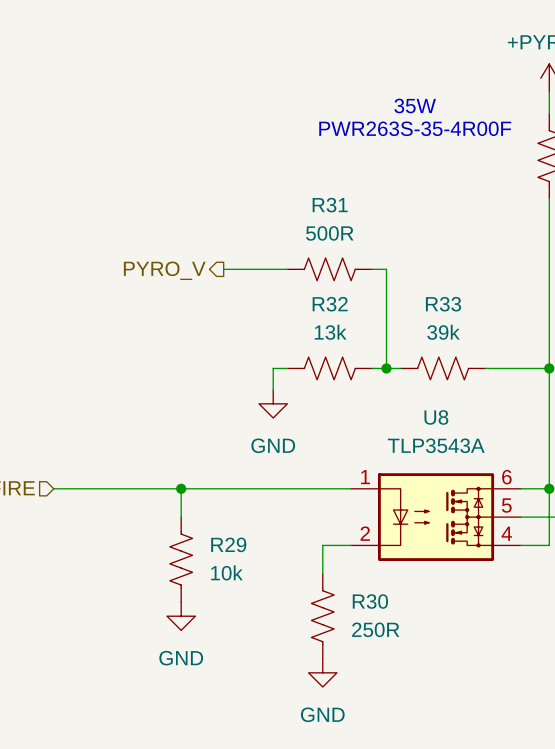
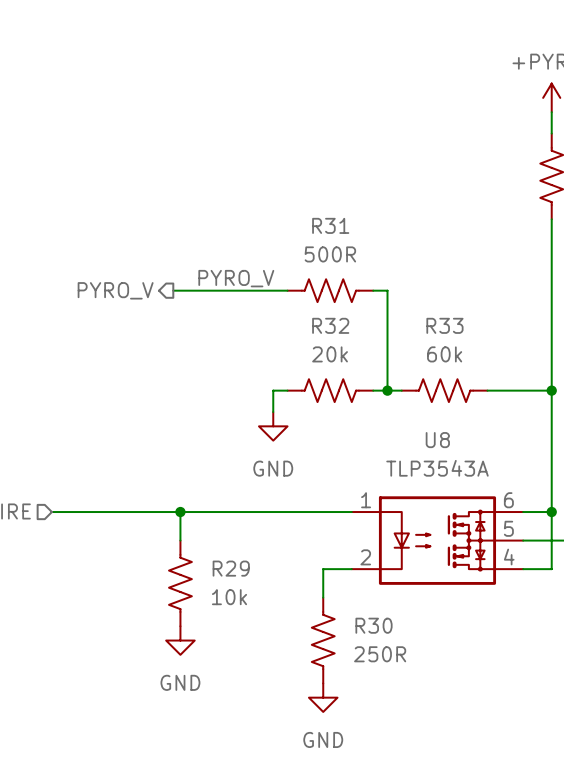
text: 35W (415, 105) -> none
text: PWR263S-35-4R00F (415, 128) -> none
label: none -> PYRO_V (236, 278)
wire: none -> (173, 290) (223, 290)
hierarchical label position: PYRO_V (164, 270) -> PYRO_V (115, 290)
R32 value: 13k (330, 332) -> 20k (330, 354)
R33 value: 39k (443, 332) -> 60k (444, 354)

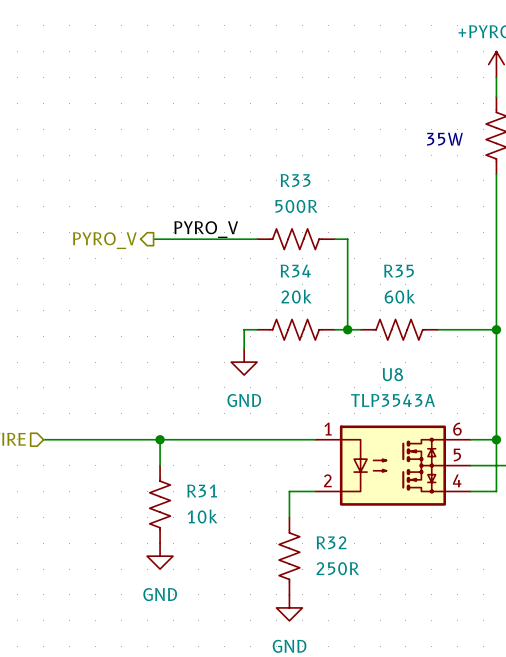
text: none -> 35W (444, 139)
R31 name: R31 (330, 225) -> R33 (295, 180)
R32 name: R32 (330, 325) -> R34 (295, 271)
R33 name: R33 (444, 325) -> R35 (399, 271)
R29 name: R29 (231, 568) -> R31 (202, 491)
R30 name: R30 (374, 625) -> R32 (331, 542)

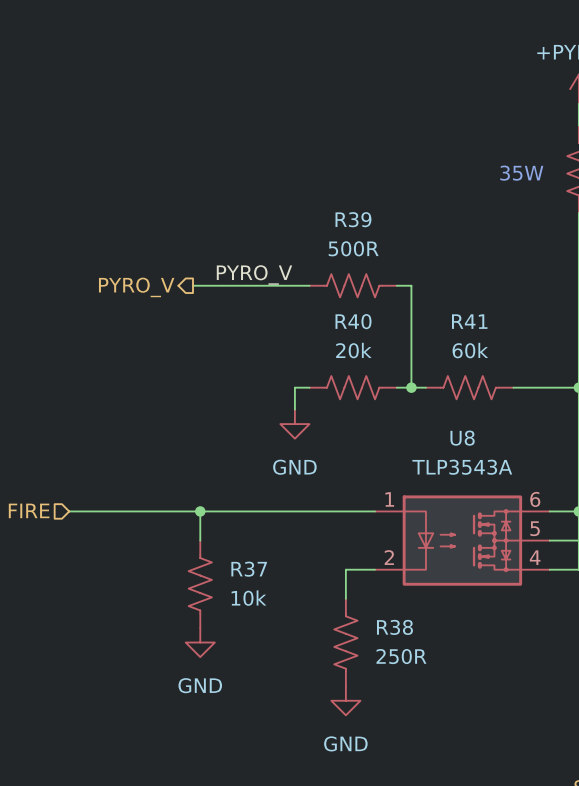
R33 name: R33 (295, 180) -> R39 (353, 219)
R34 name: R34 (295, 271) -> R40 (353, 321)
R35 name: R35 (399, 271) -> R41 (469, 321)
R31 name: R31 (202, 491) -> R37 (249, 569)
R32 name: R32 (331, 542) -> R38 (394, 627)

